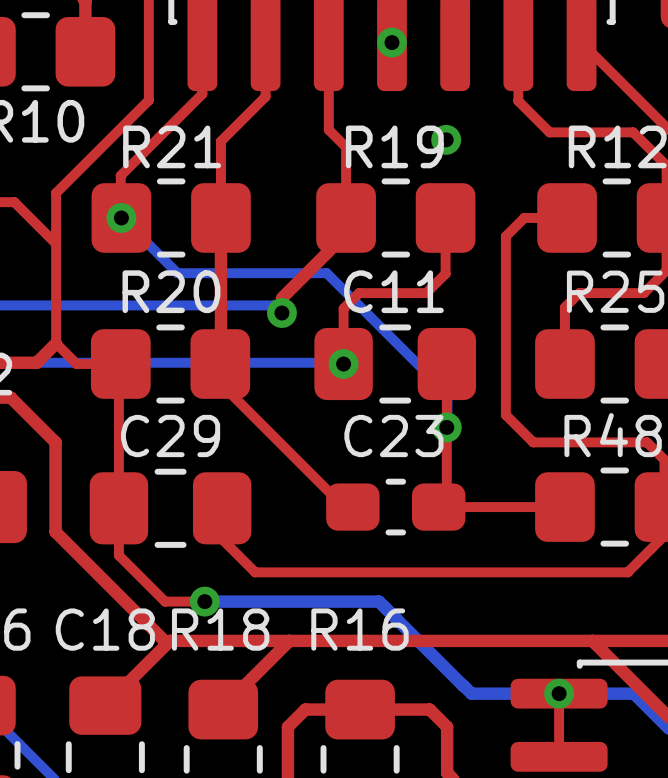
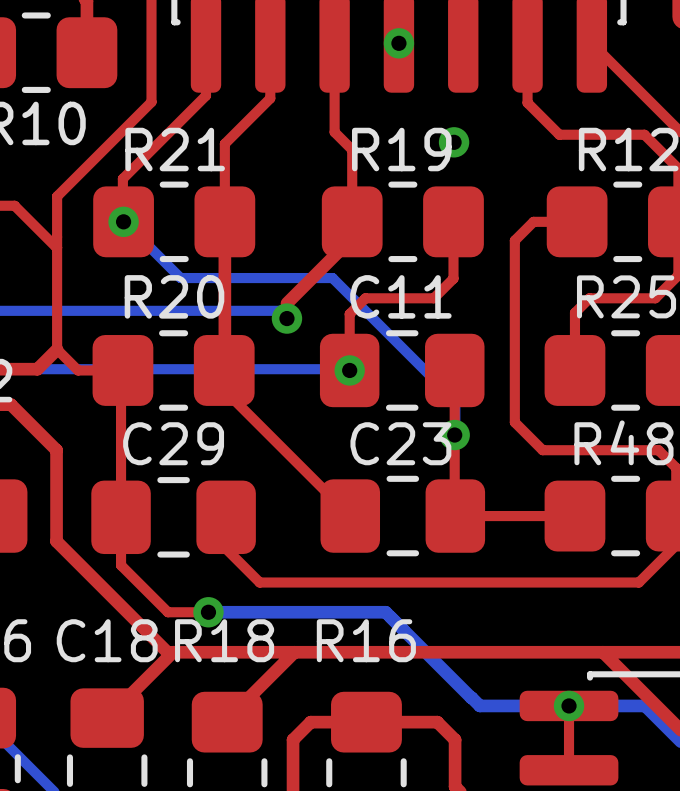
C23 footprint: [326, 478, 466, 536] -> [320, 475, 486, 557]

